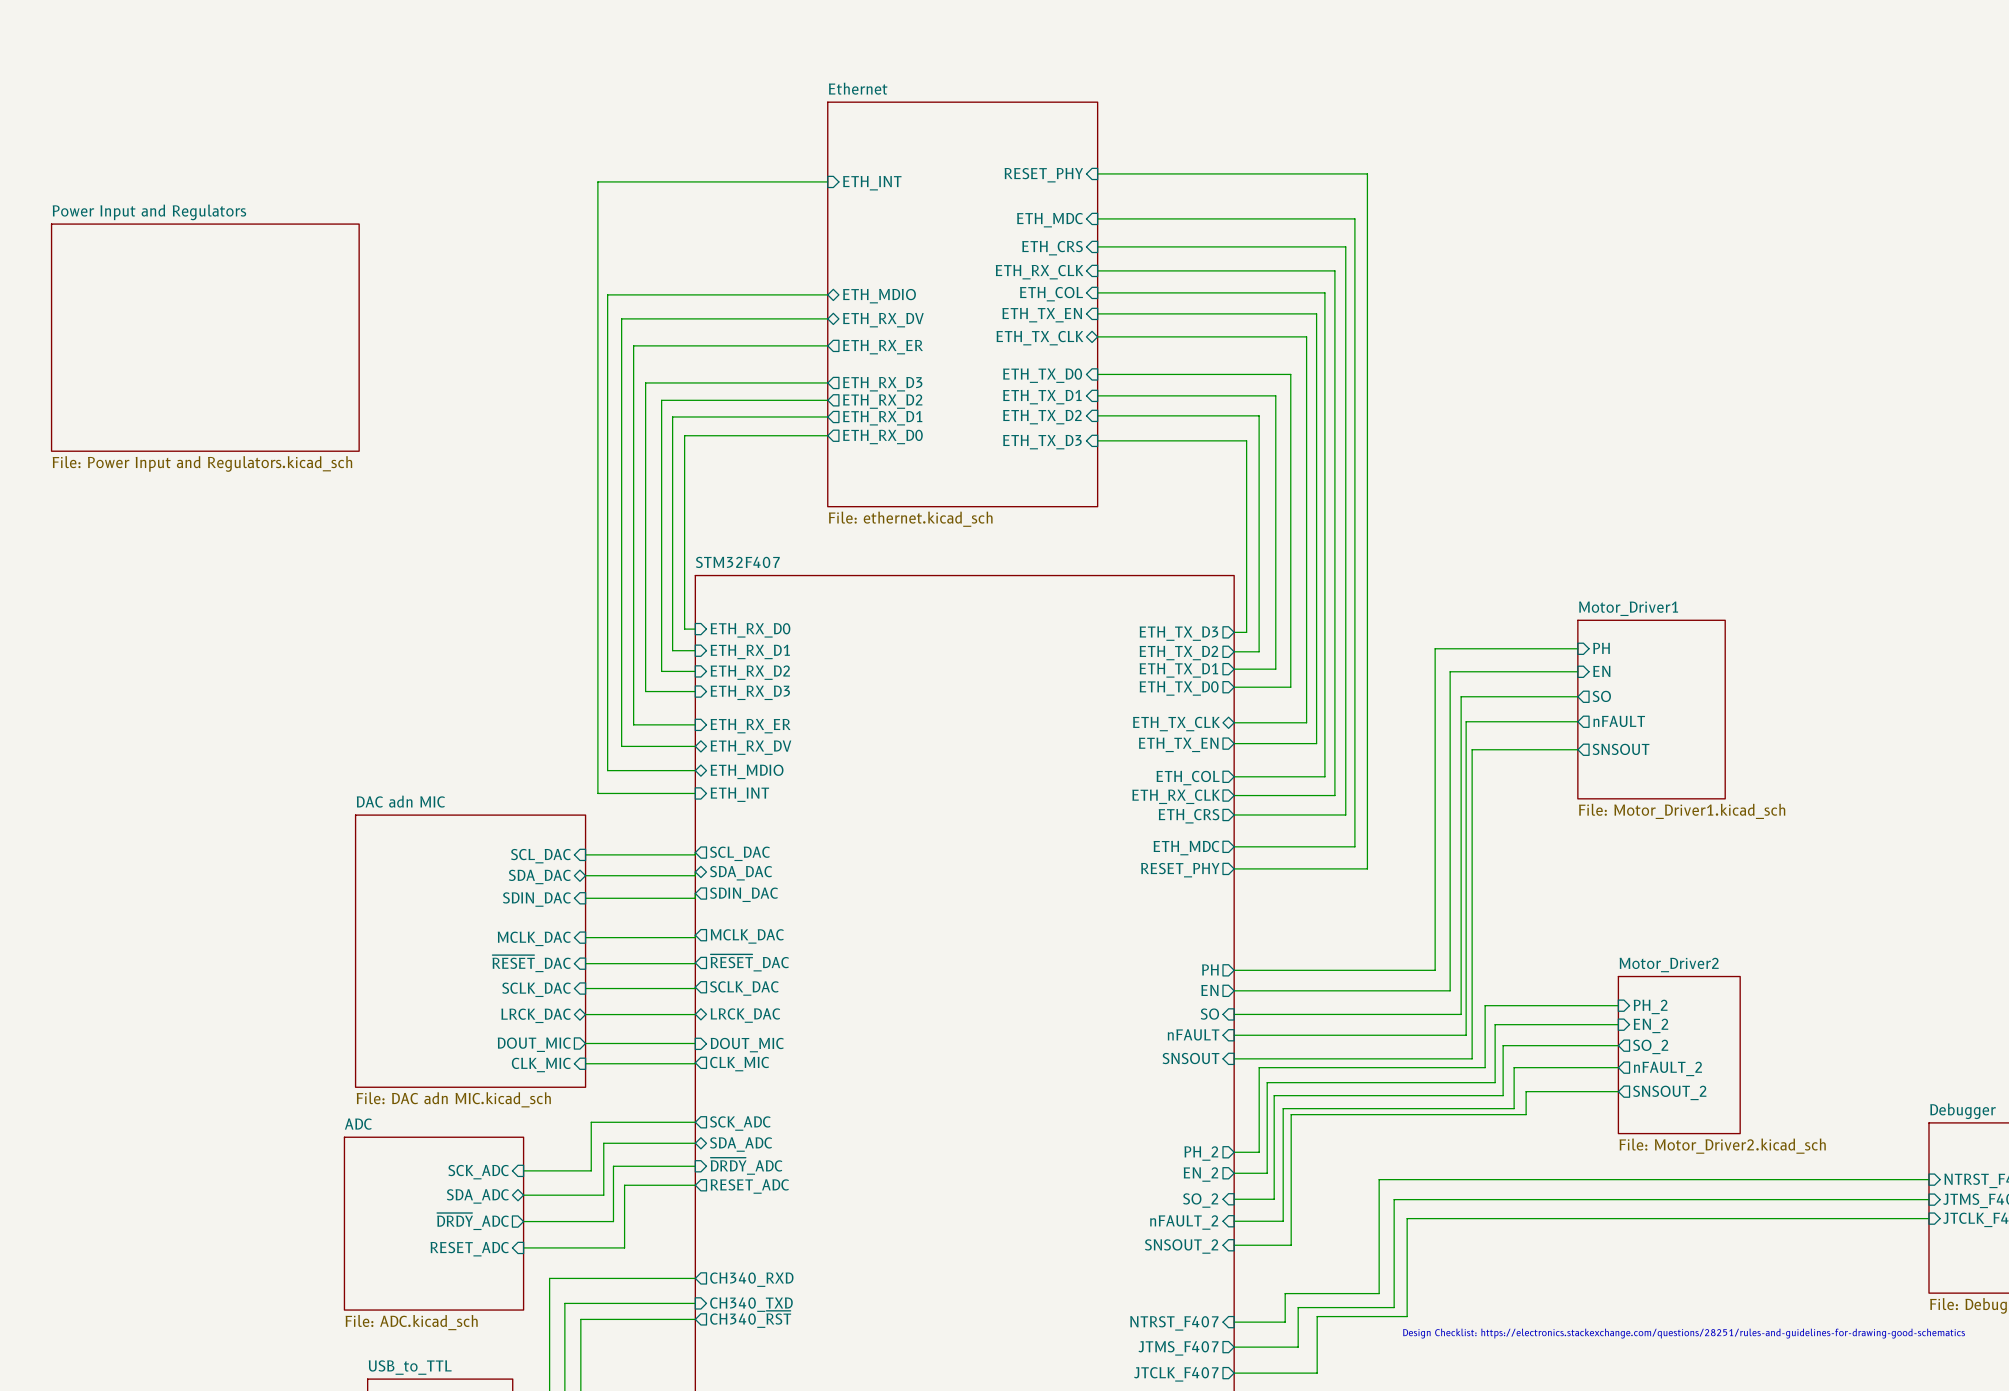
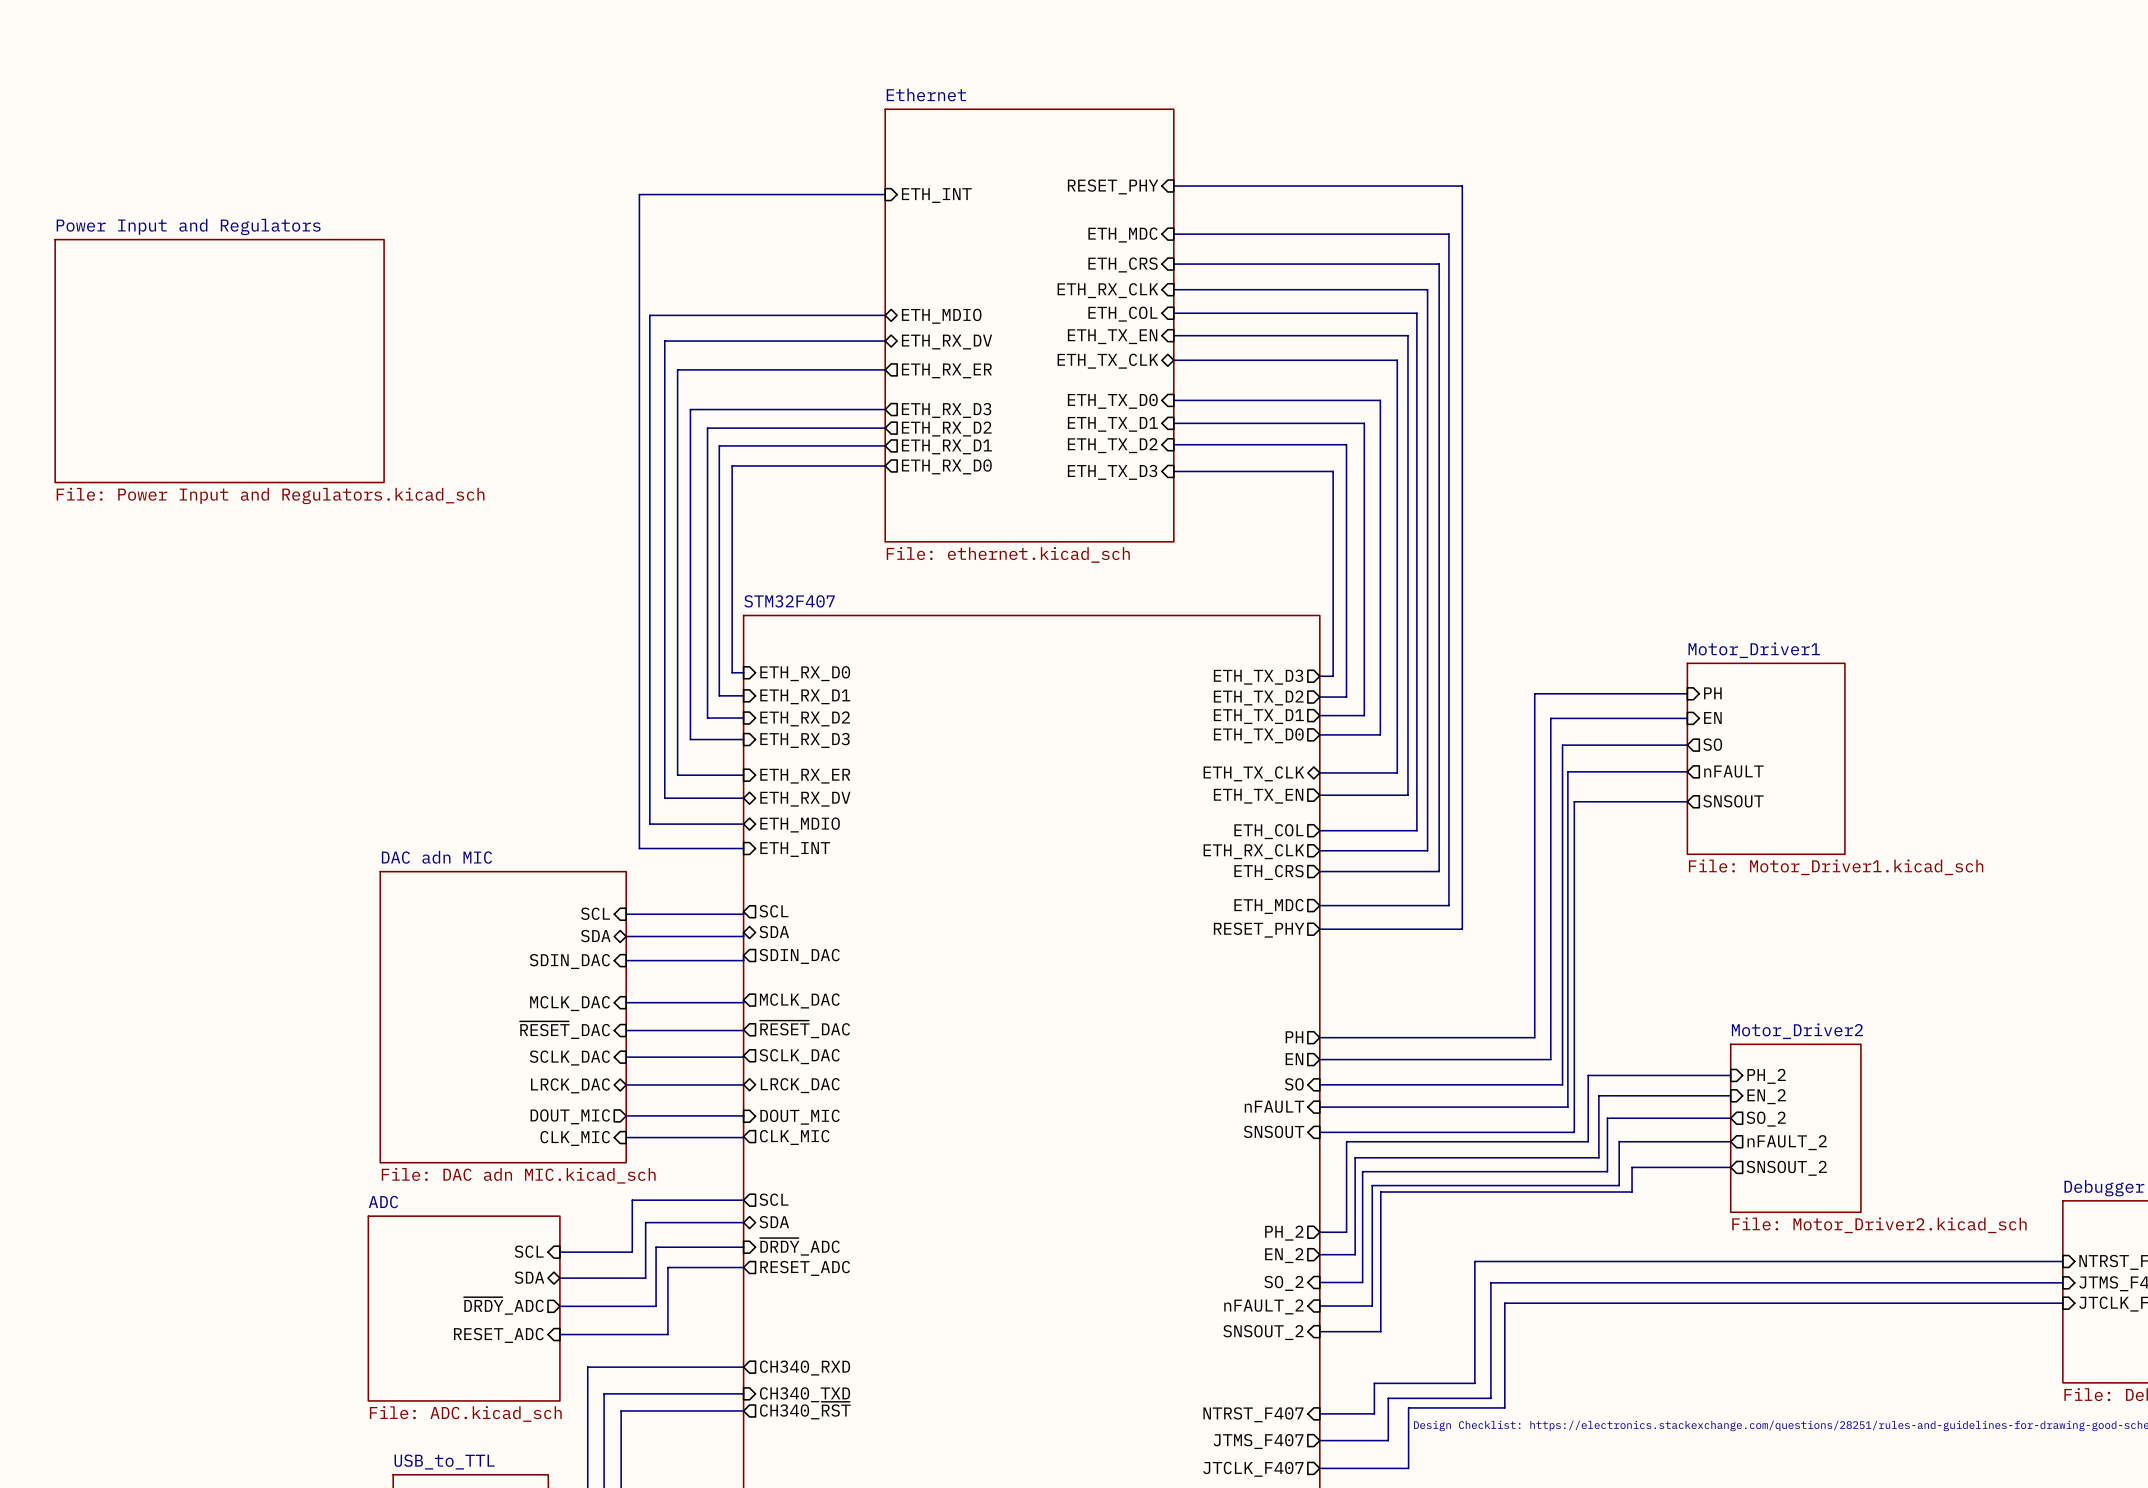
sheet pin: SCL_DAC (739, 853) -> SCL (773, 911)
sheet pin: SCL_DAC (540, 856) -> SCL (595, 913)
sheet pin: SDA_DAC (741, 873) -> SDA (774, 932)
sheet pin: SDA_DAC (539, 876) -> SDA (595, 936)
sheet pin: SCK_ADC (740, 1123) -> SCL (773, 1199)
sheet pin: SDA_ADC (741, 1144) -> SDA (774, 1222)
sheet pin: SCK_ADC (478, 1172) -> SCL (529, 1251)
sheet pin: SDA_ADC (477, 1196) -> SDA (529, 1277)

